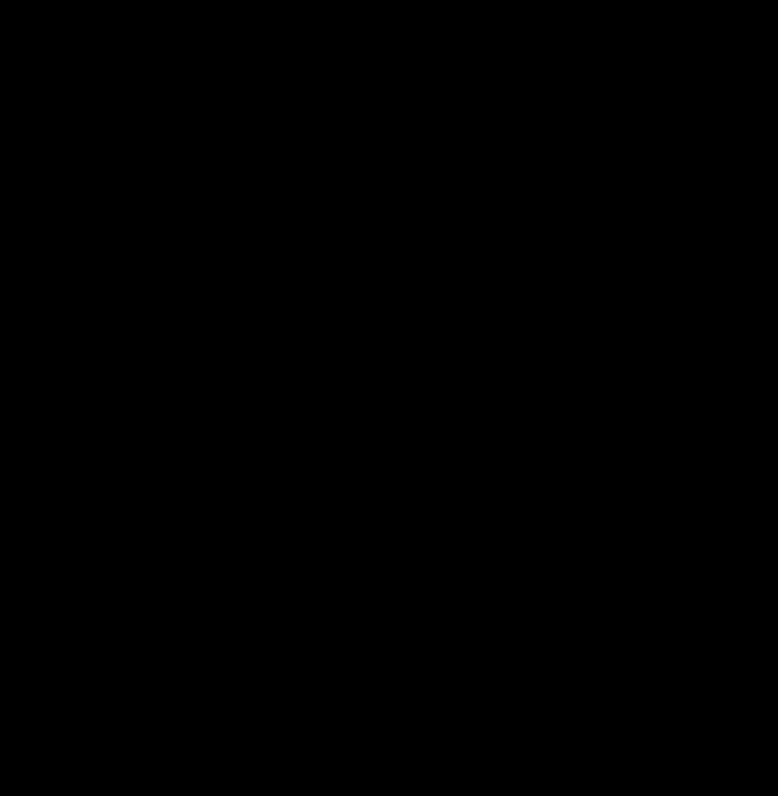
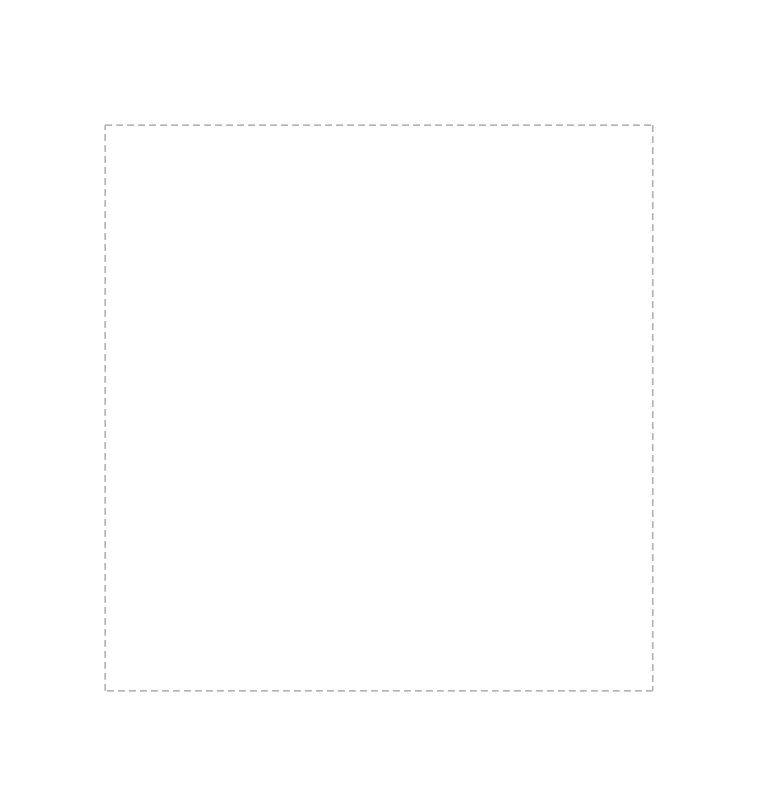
zone outline: none -> (105, 125) (105, 690) (652, 690) (652, 125) (105, 125)

